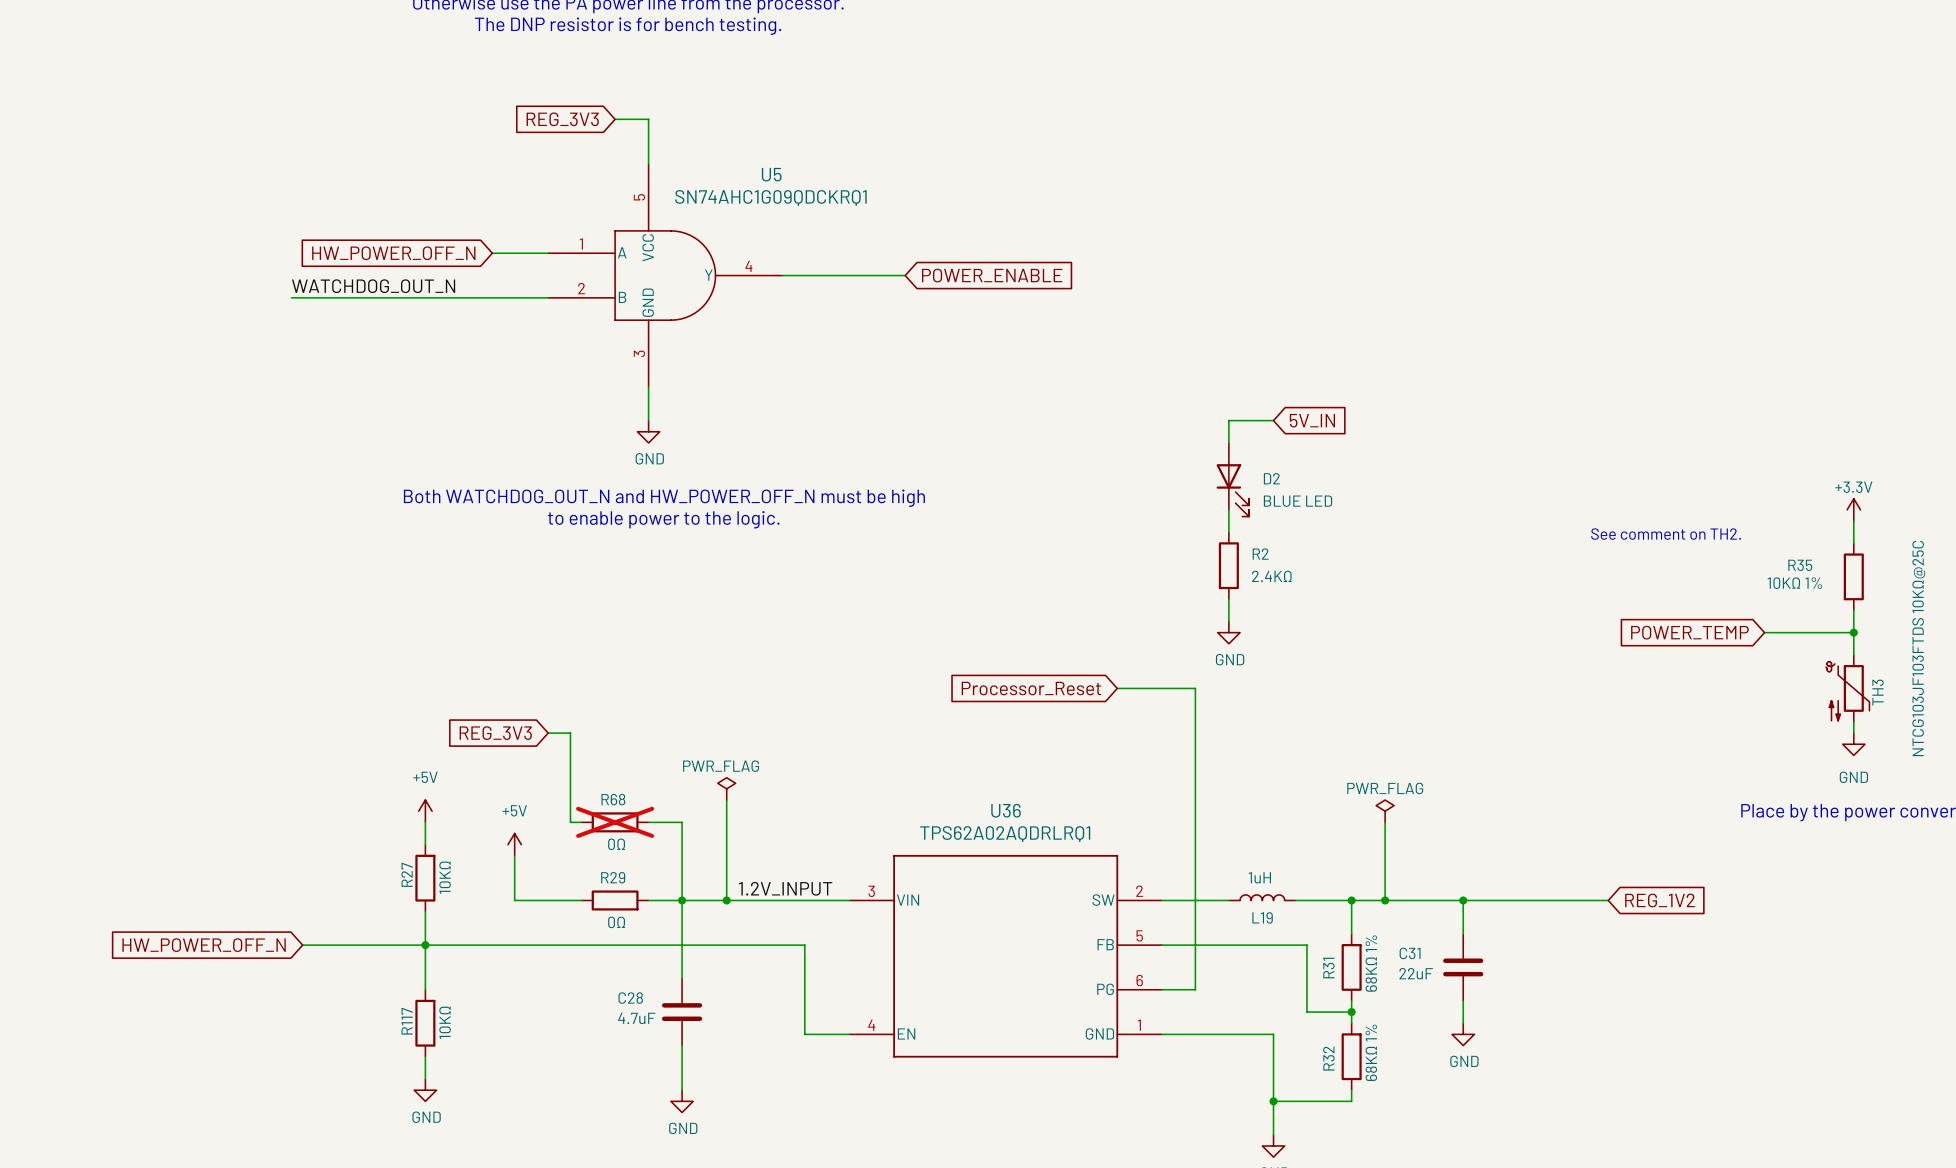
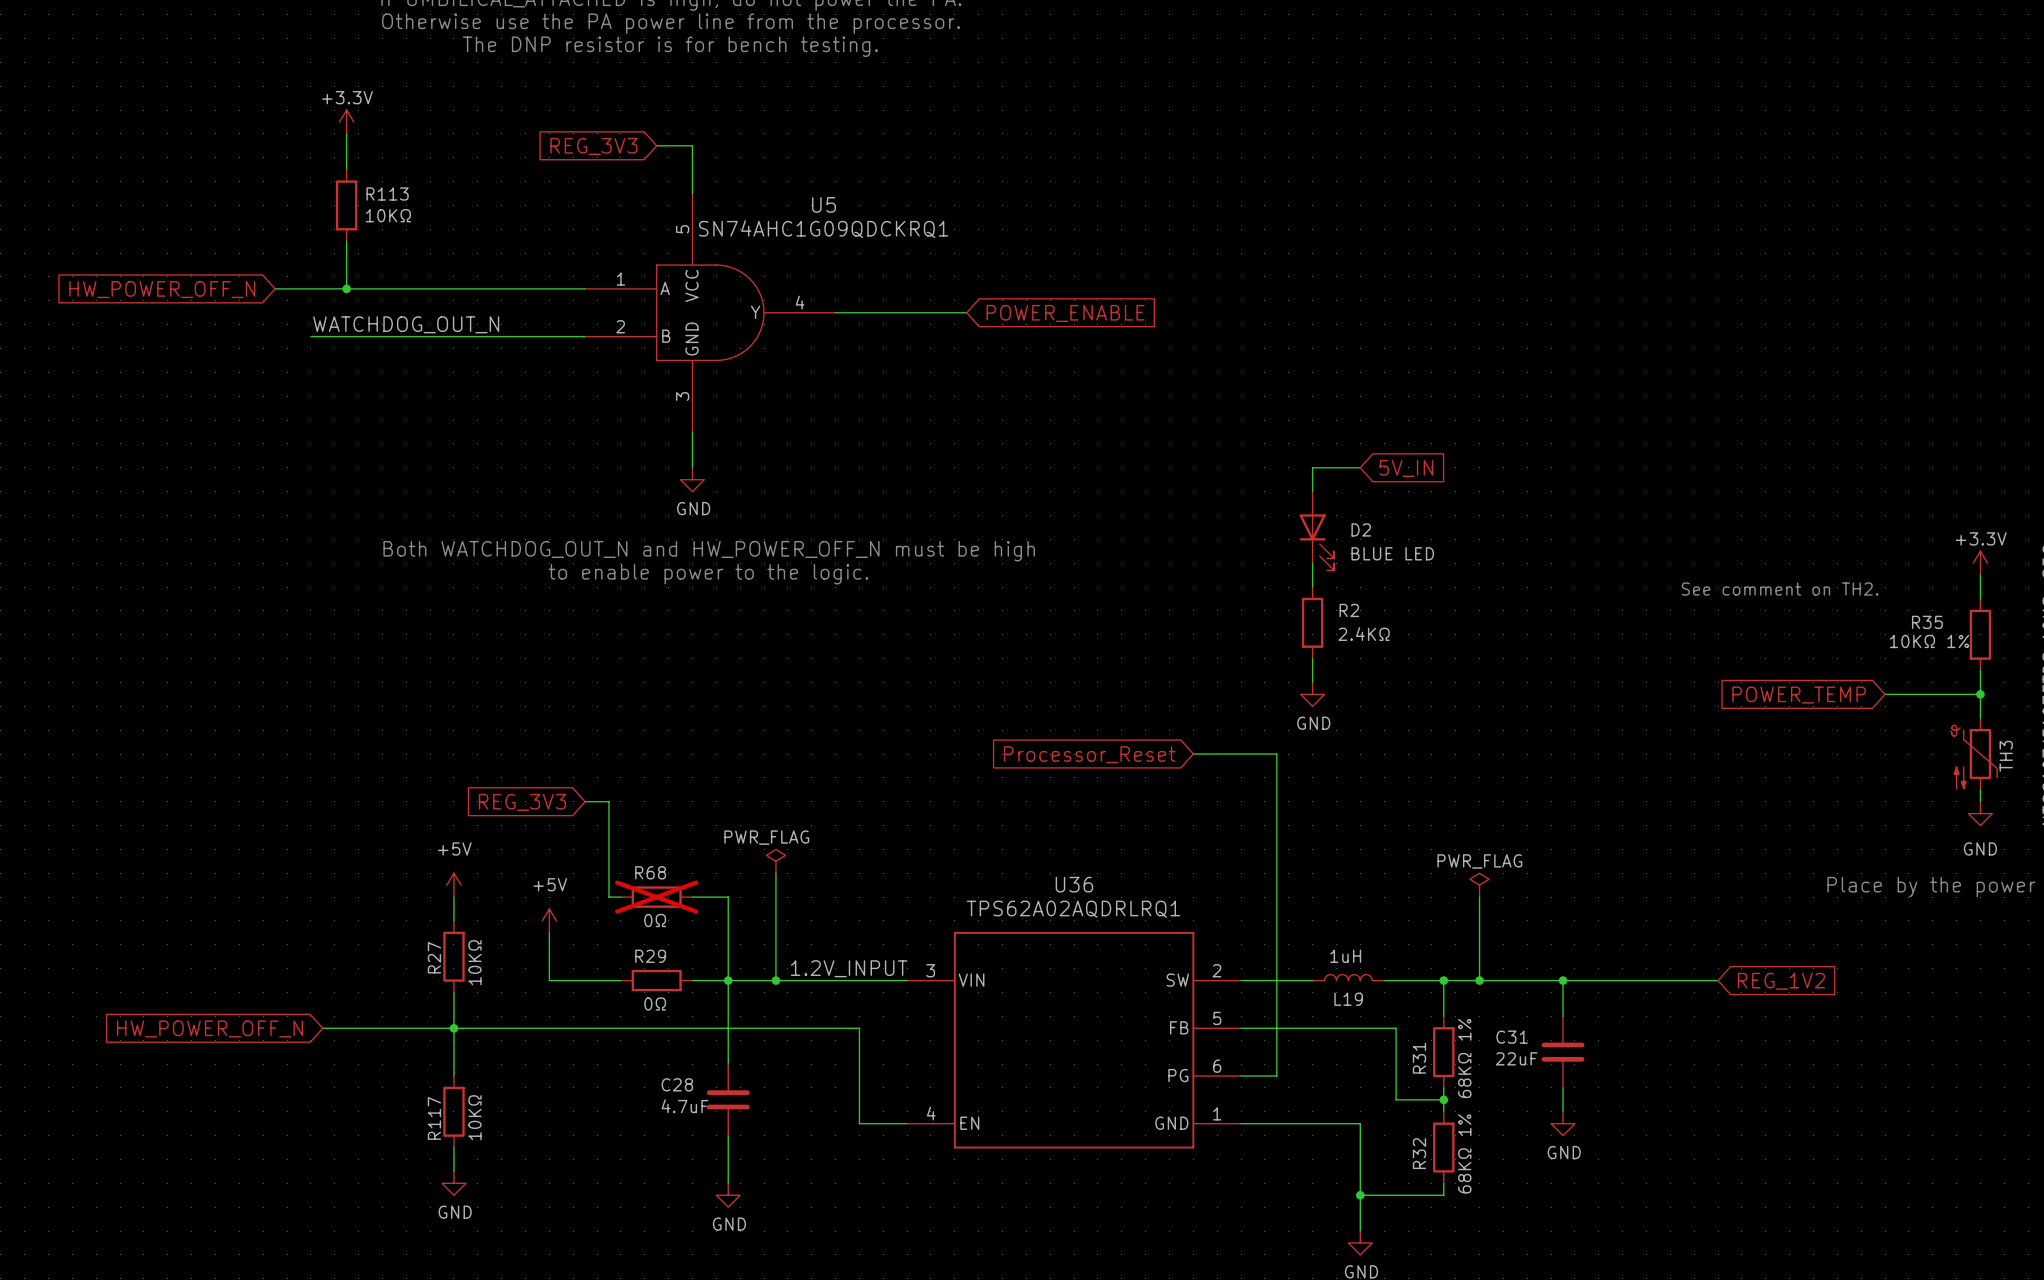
power symbol: none -> +3.3V (346, 121)
wire: none -> (346, 133) (346, 169)
R113: none -> 10KΩ (346, 205)
wire: none -> (346, 241) (346, 288)
global label: none -> HW_POWER_OFF_N (162, 289)
wire: none -> (275, 288) (525, 288)
junction: none -> (346, 288)
global label: HW_POWER_OFF_N (393, 253) -> none

